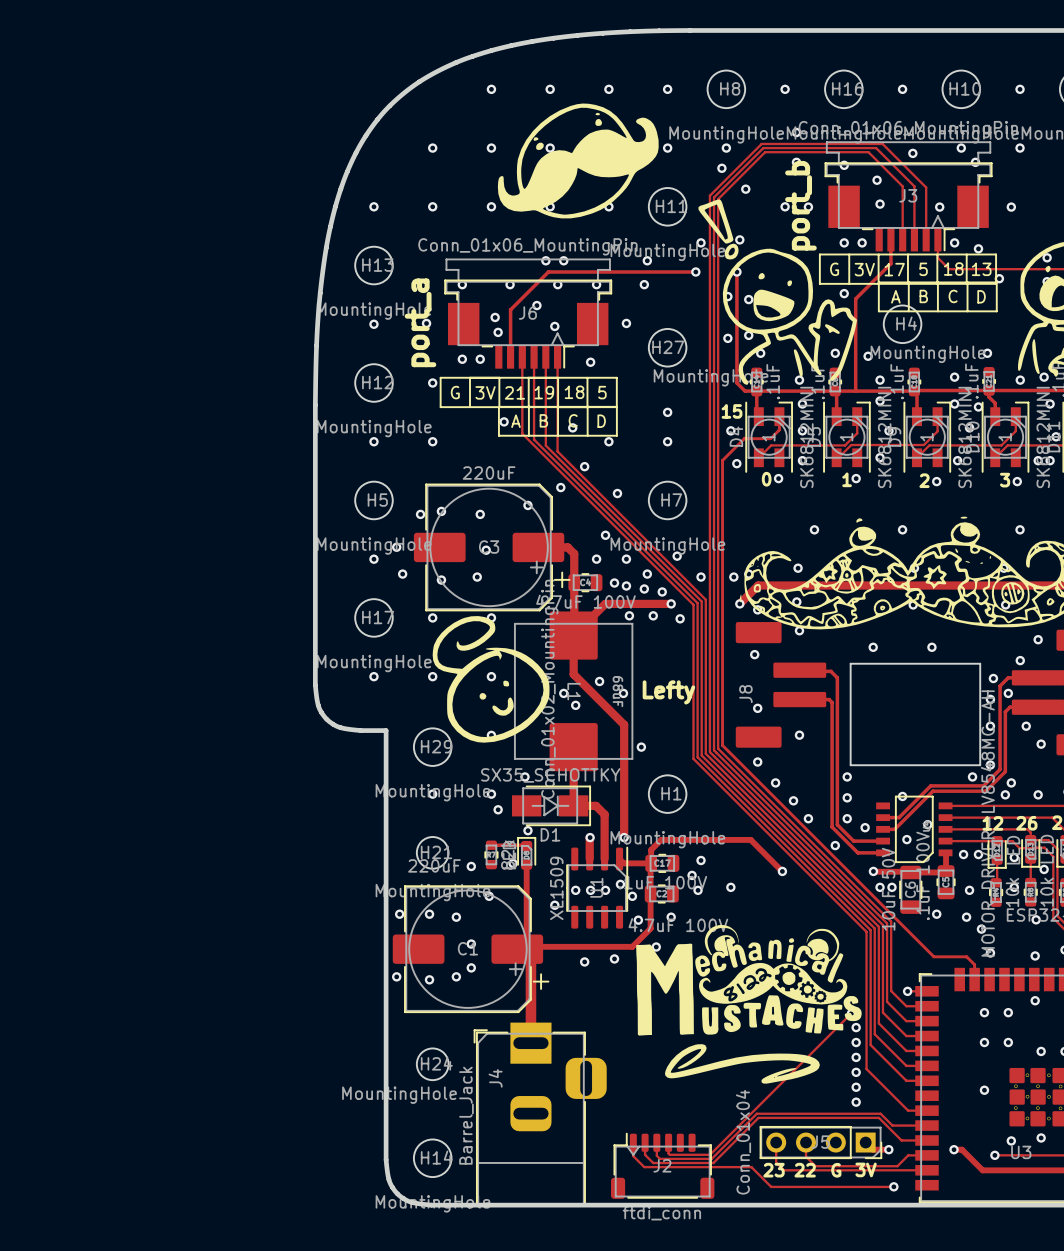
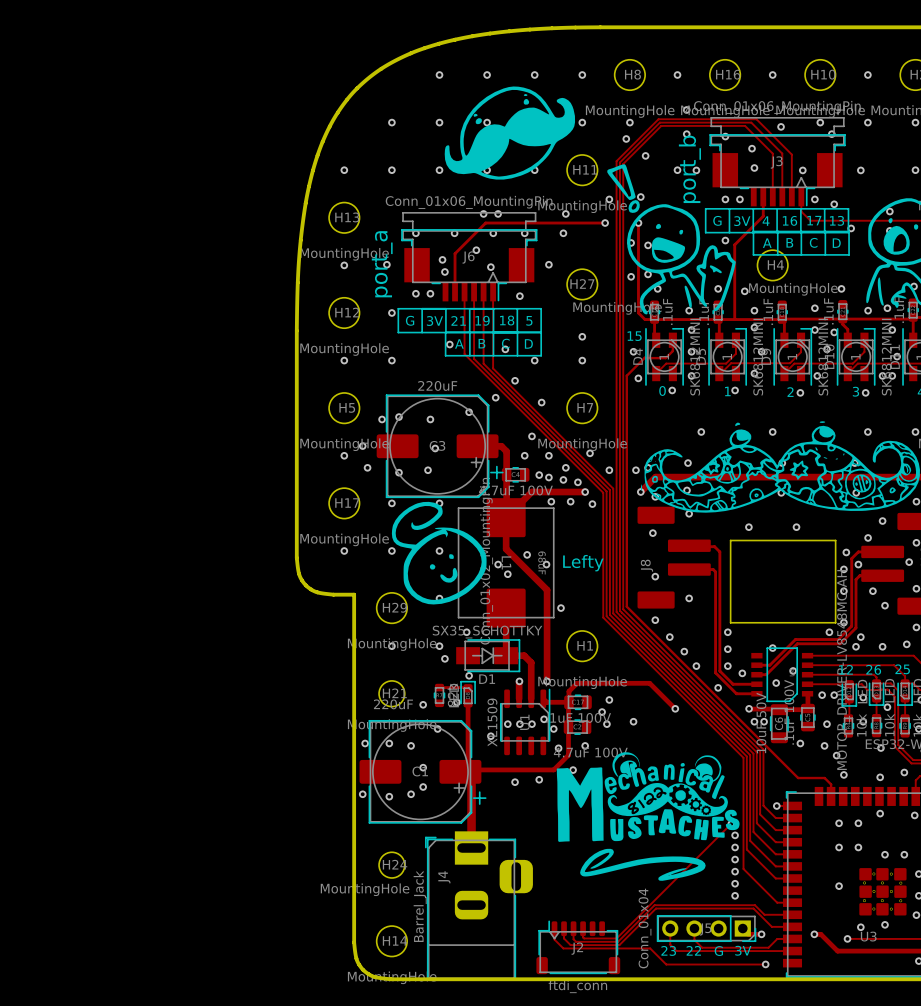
text: 17 (894, 269) -> 4 (766, 221)
text: 5 (923, 269) -> 16 (790, 220)
text: 18 (953, 269) -> 17 (814, 220)

